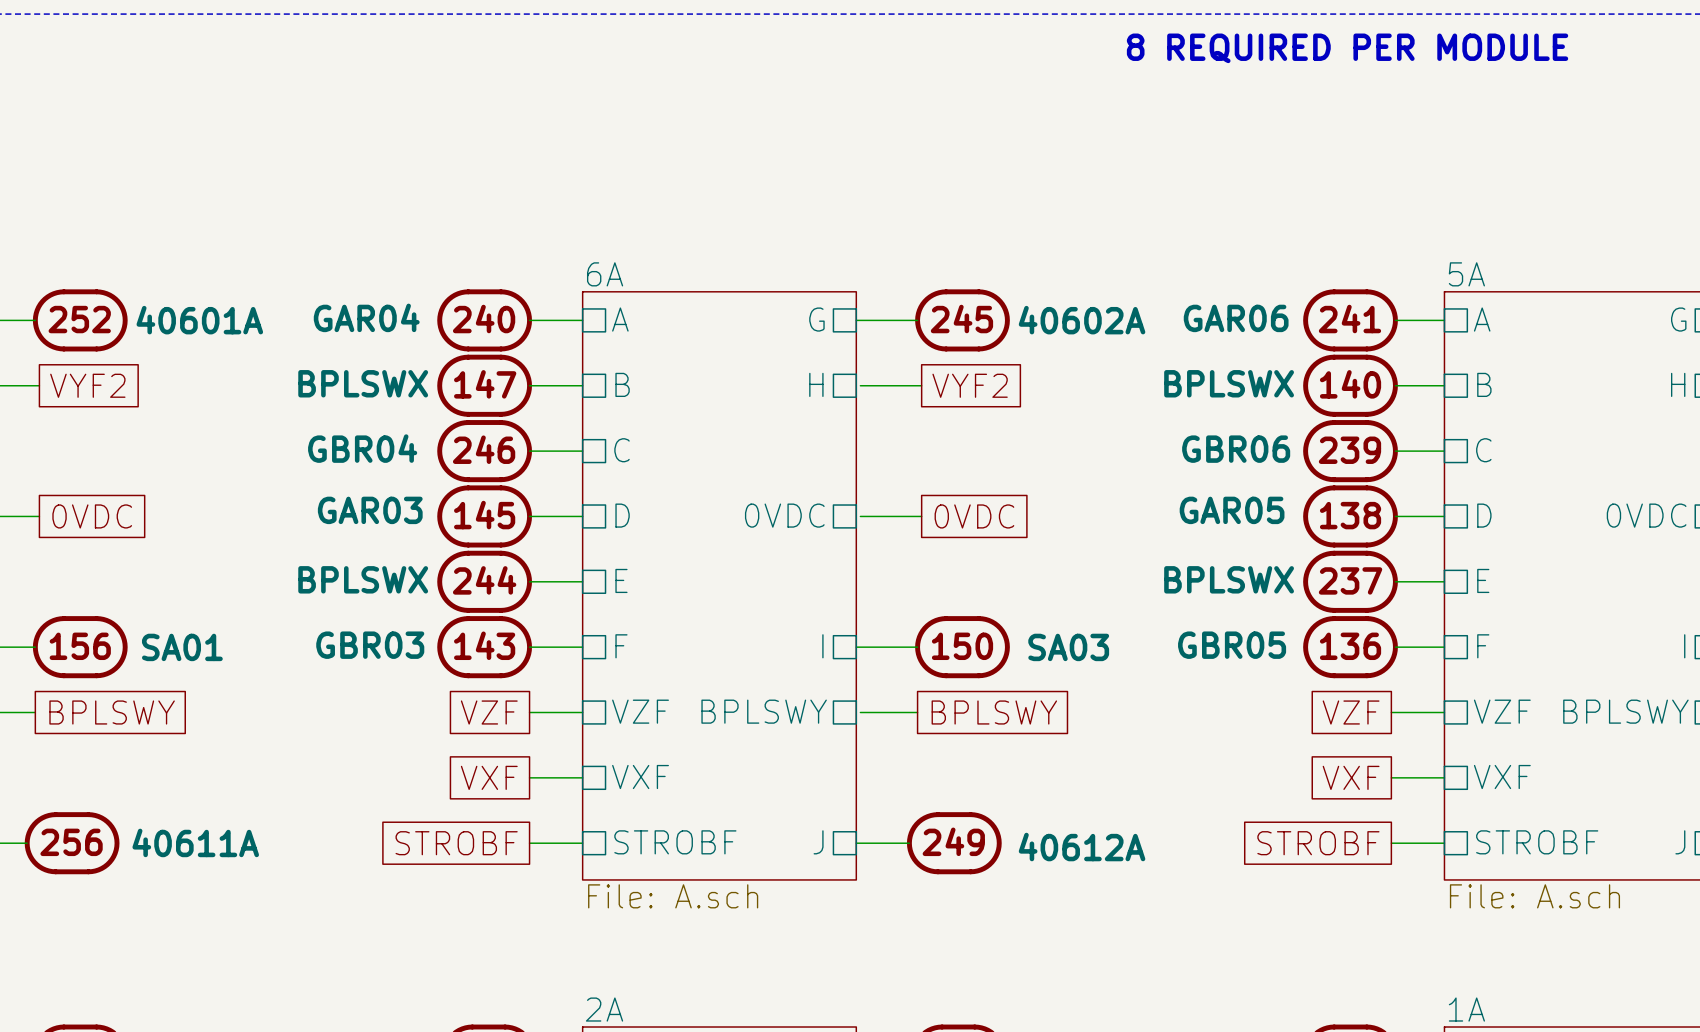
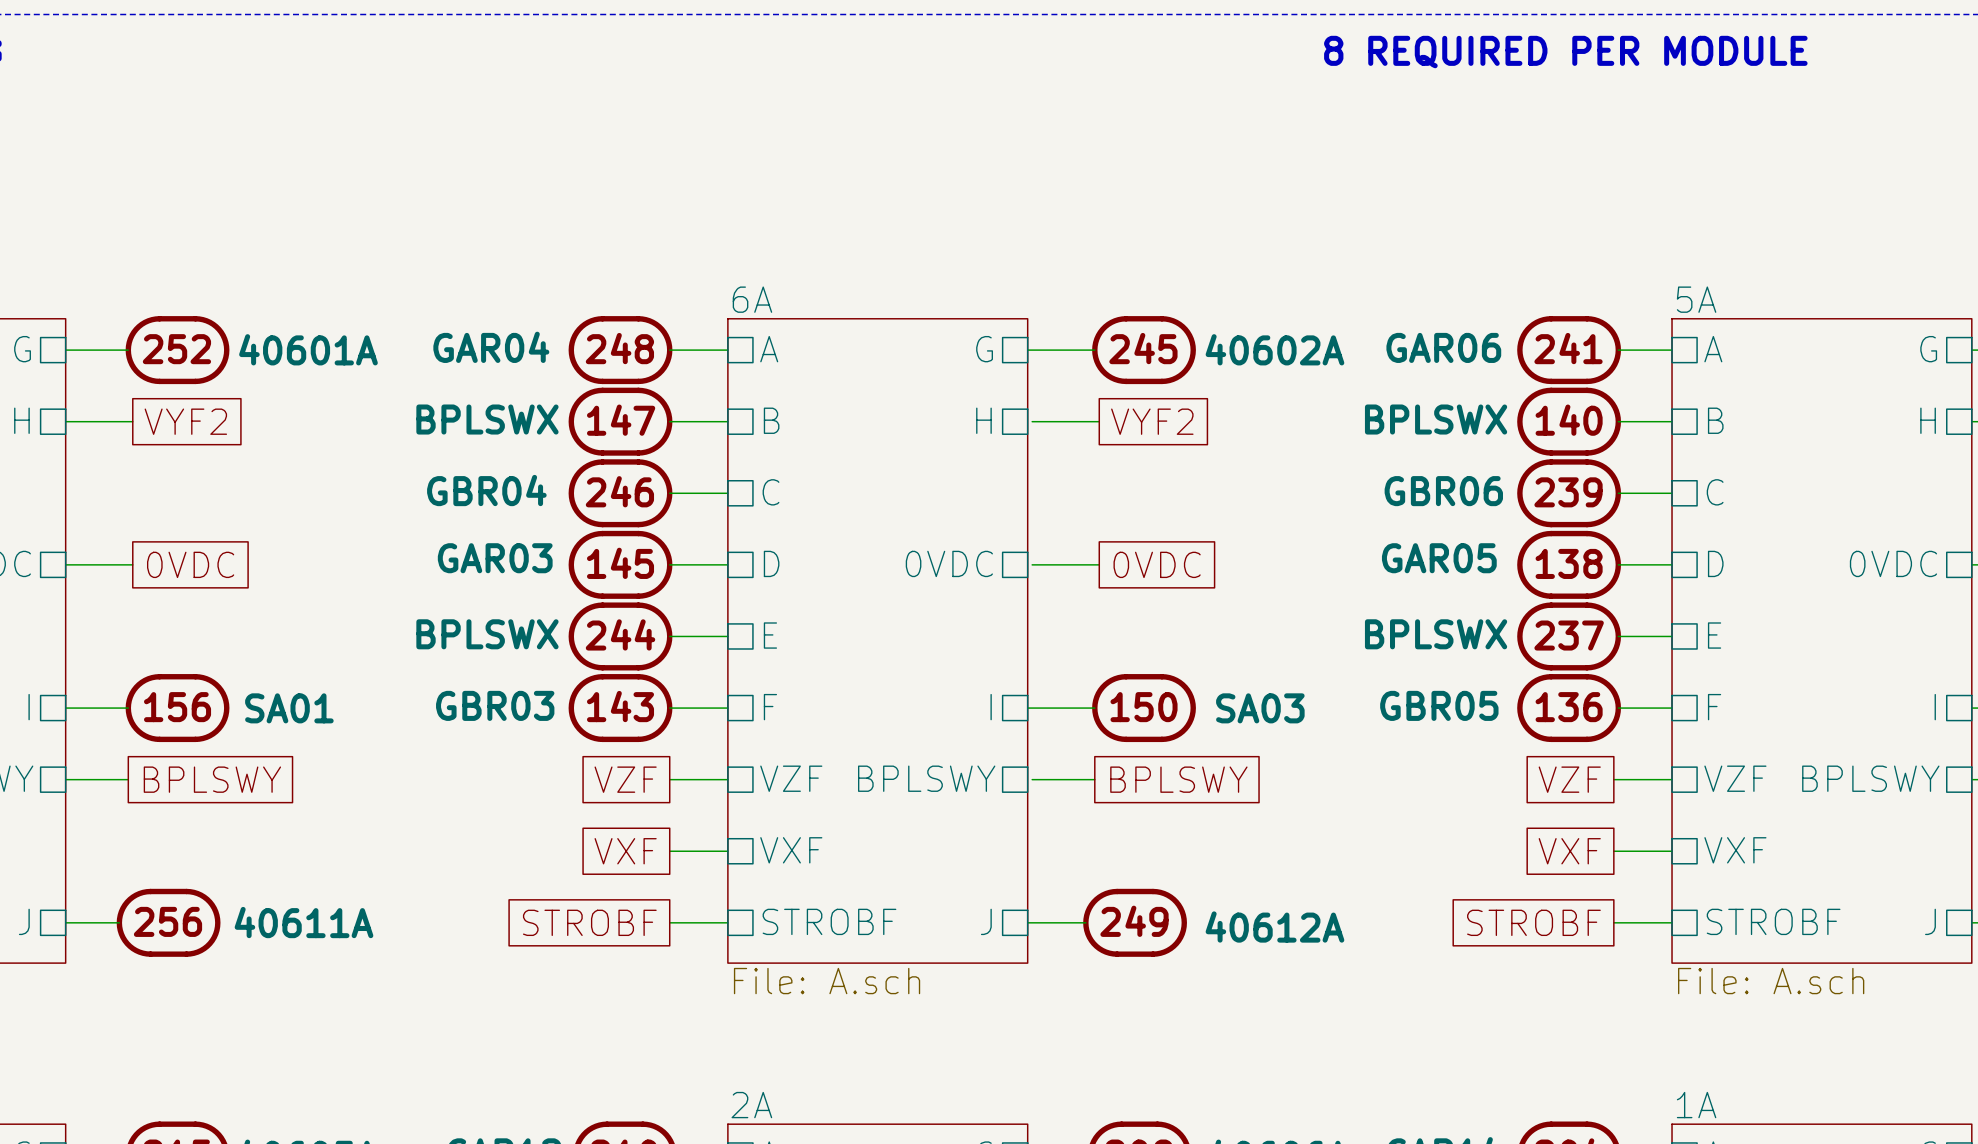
part text: 240 (484, 319) -> 248 (619, 348)

